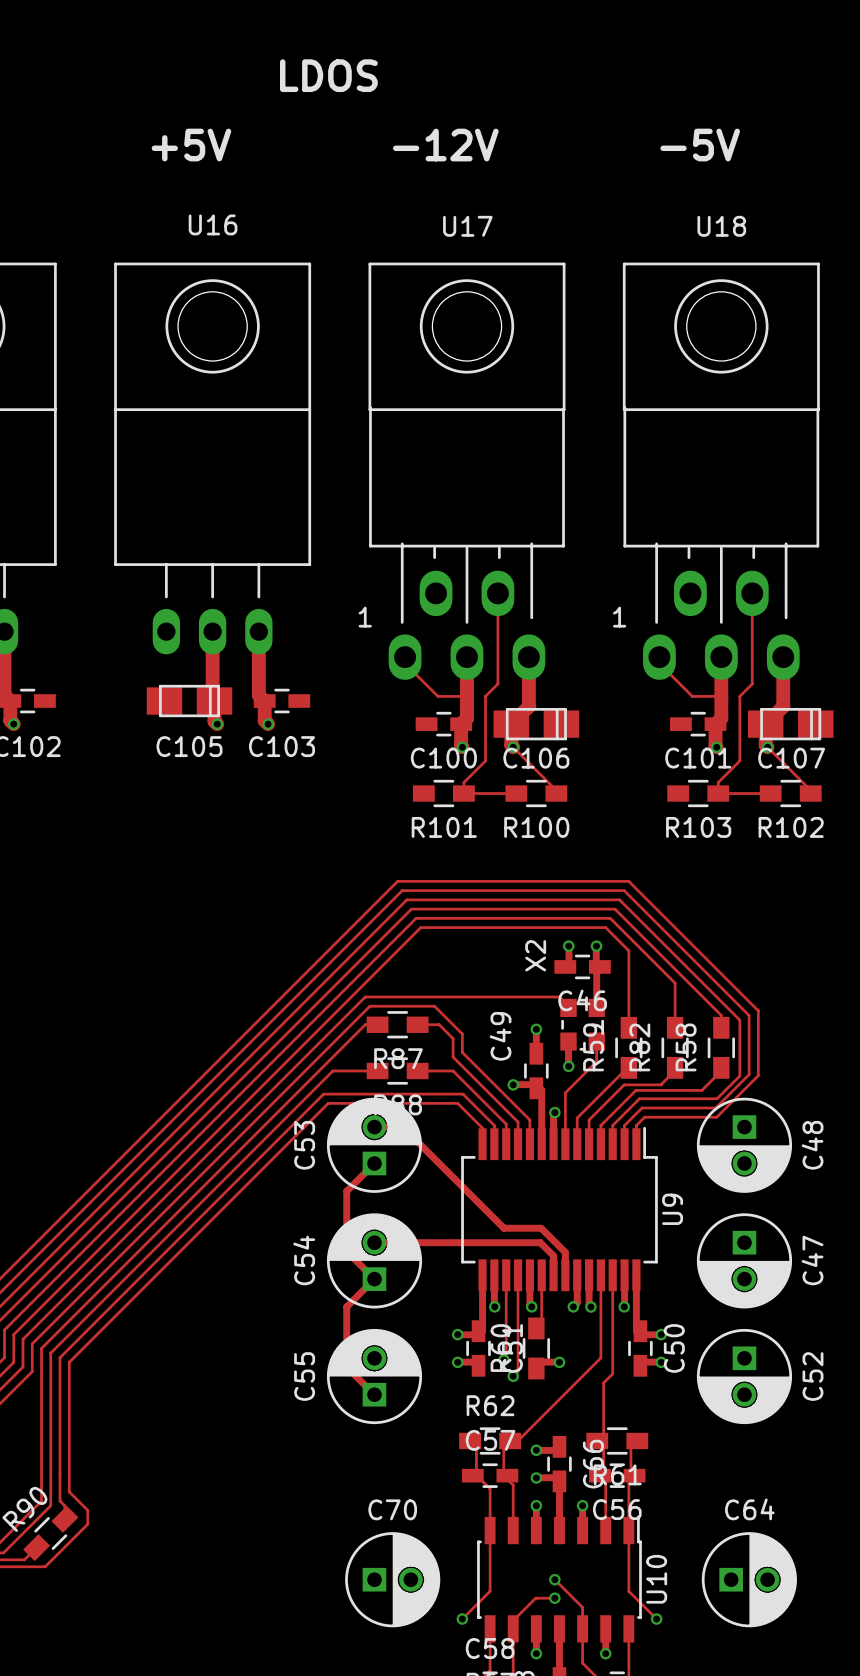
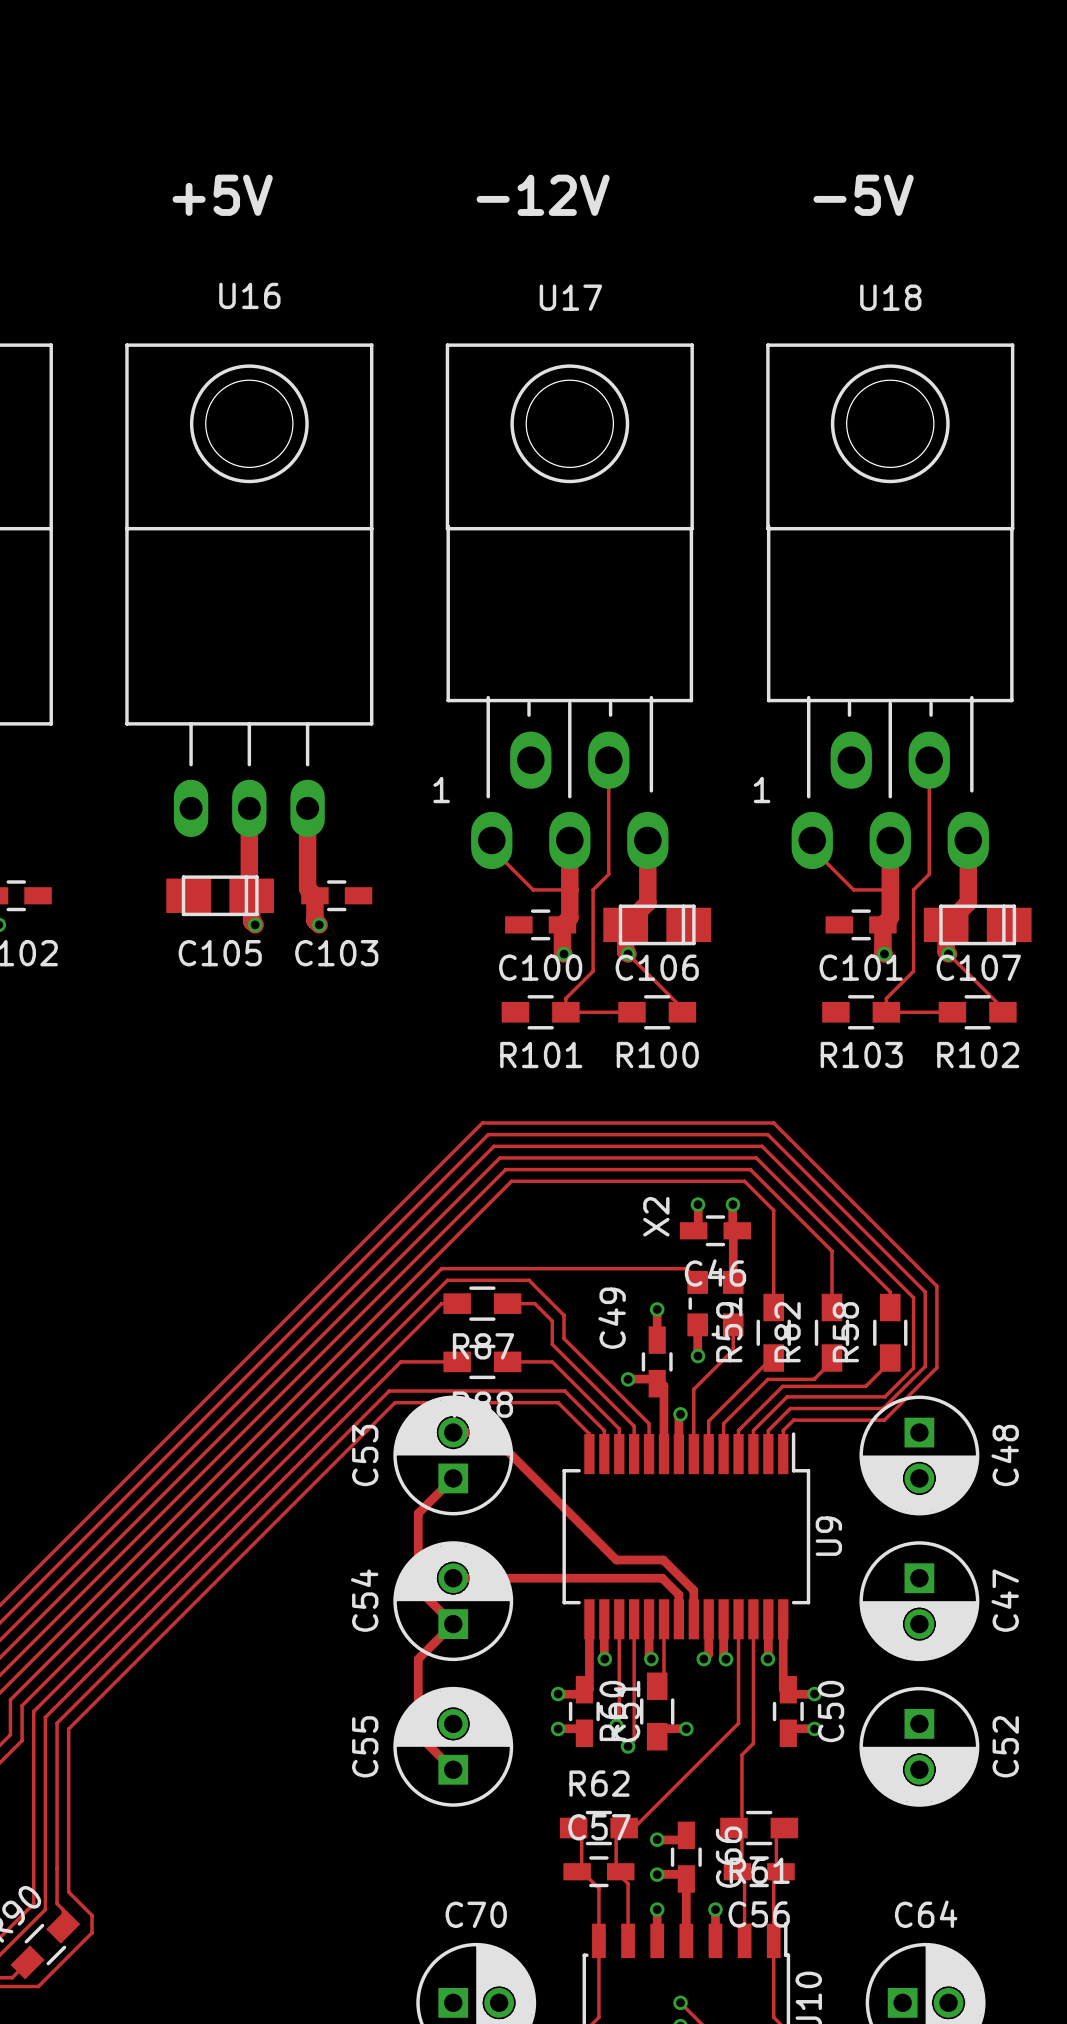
text: LDOS (328, 75) -> none

